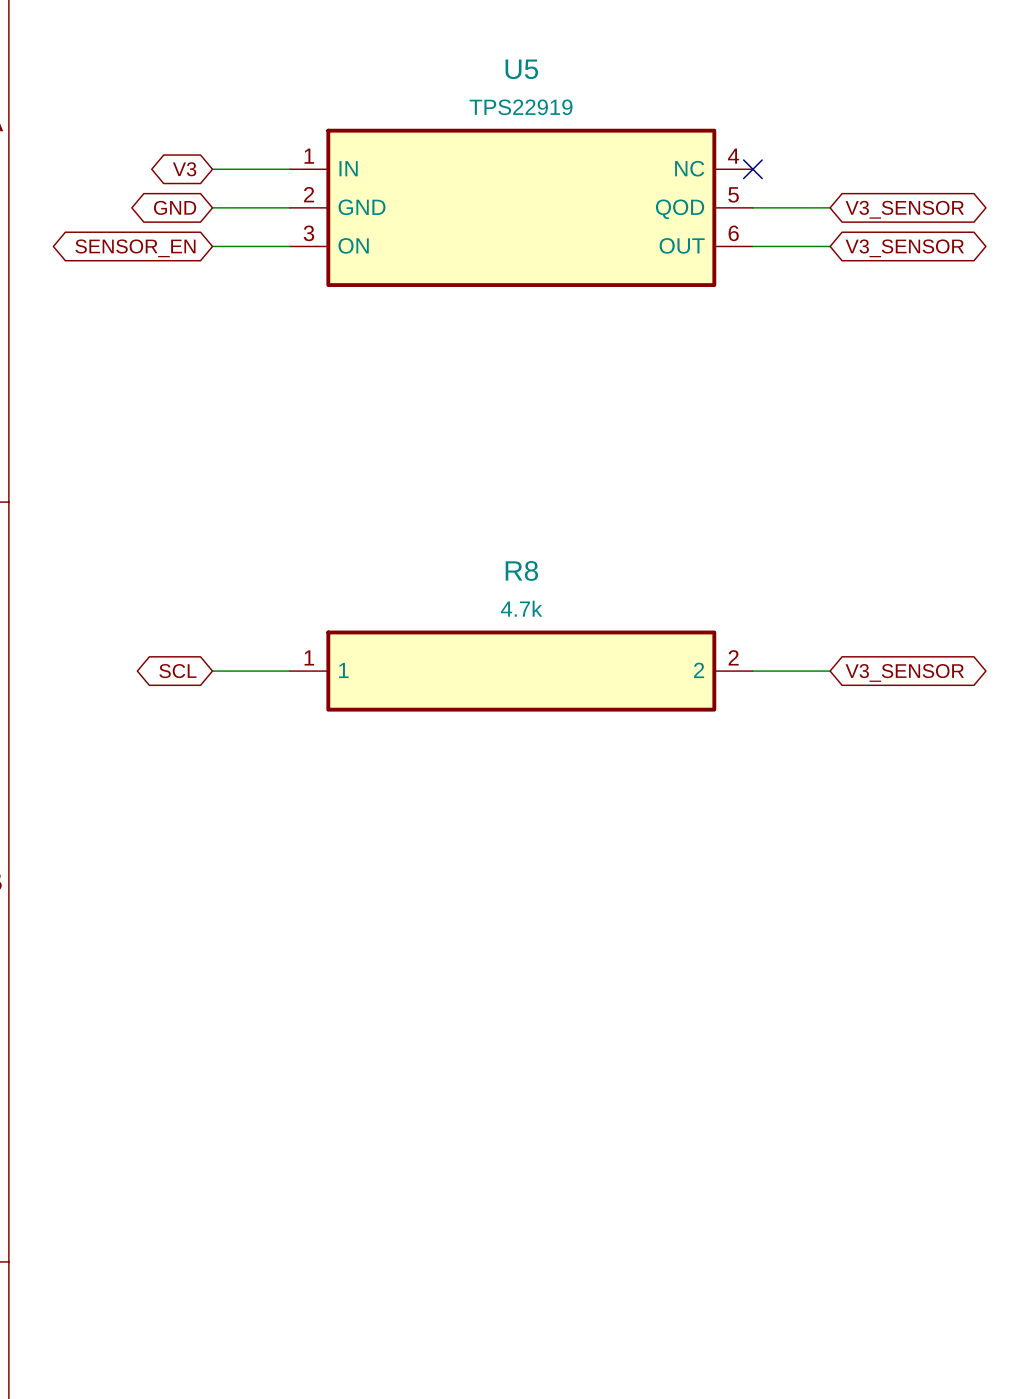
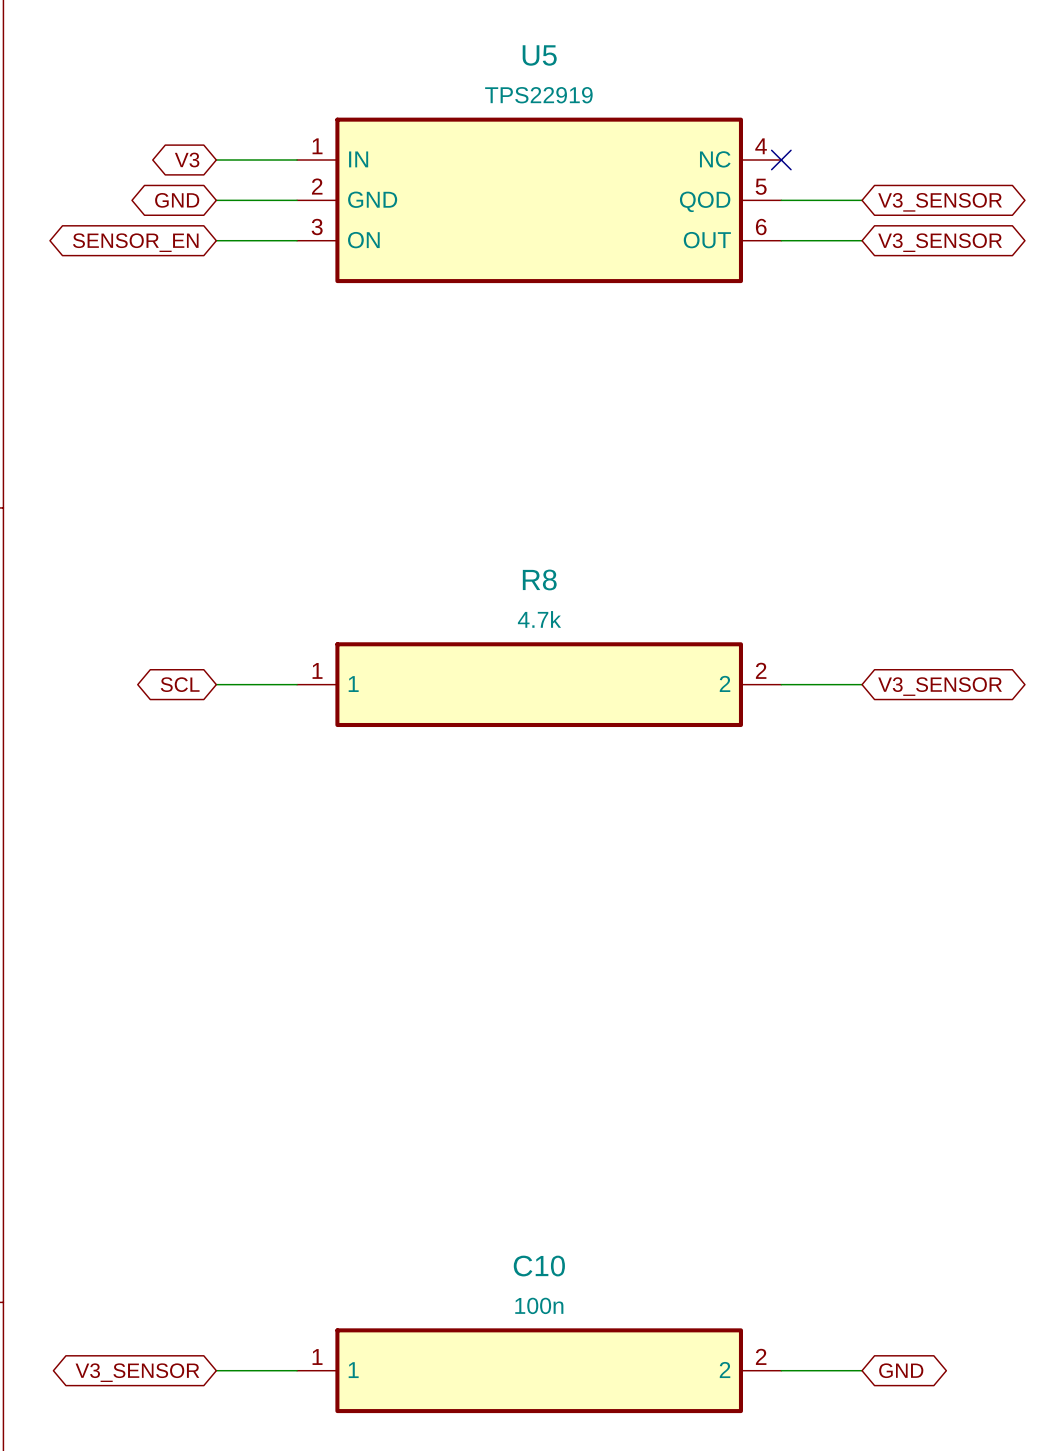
wire: none -> (216, 1370) (297, 1370)
C10: none -> 100n (539, 1370)
wire: none -> (781, 1370) (862, 1370)
global label: none -> GND (901, 1370)
global label: none -> V3_SENSOR (137, 1372)

